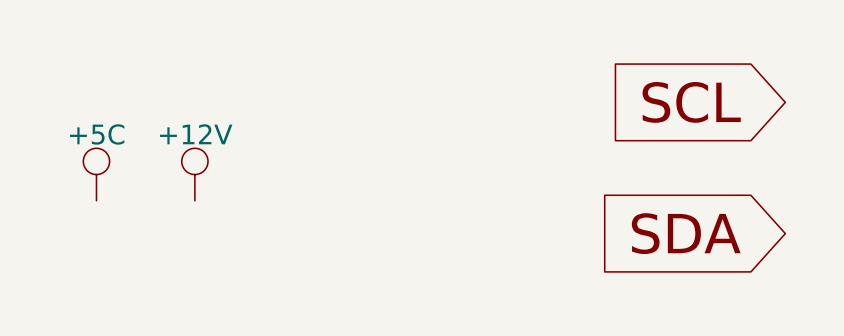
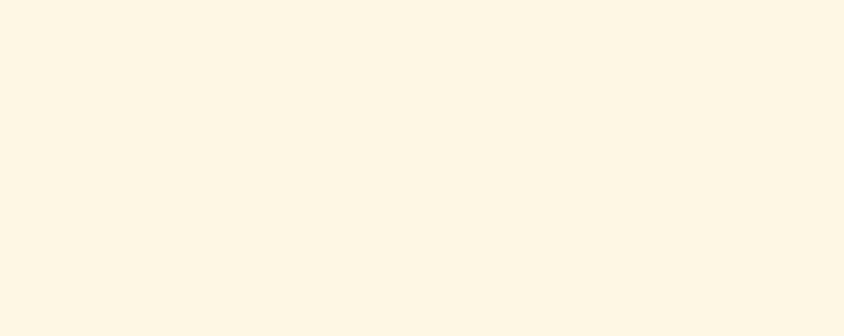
global label: SCL (691, 102) -> none
power symbol: +5C (96, 174) -> none
power symbol: +12V (194, 174) -> none
global label: SDA (686, 233) -> none

